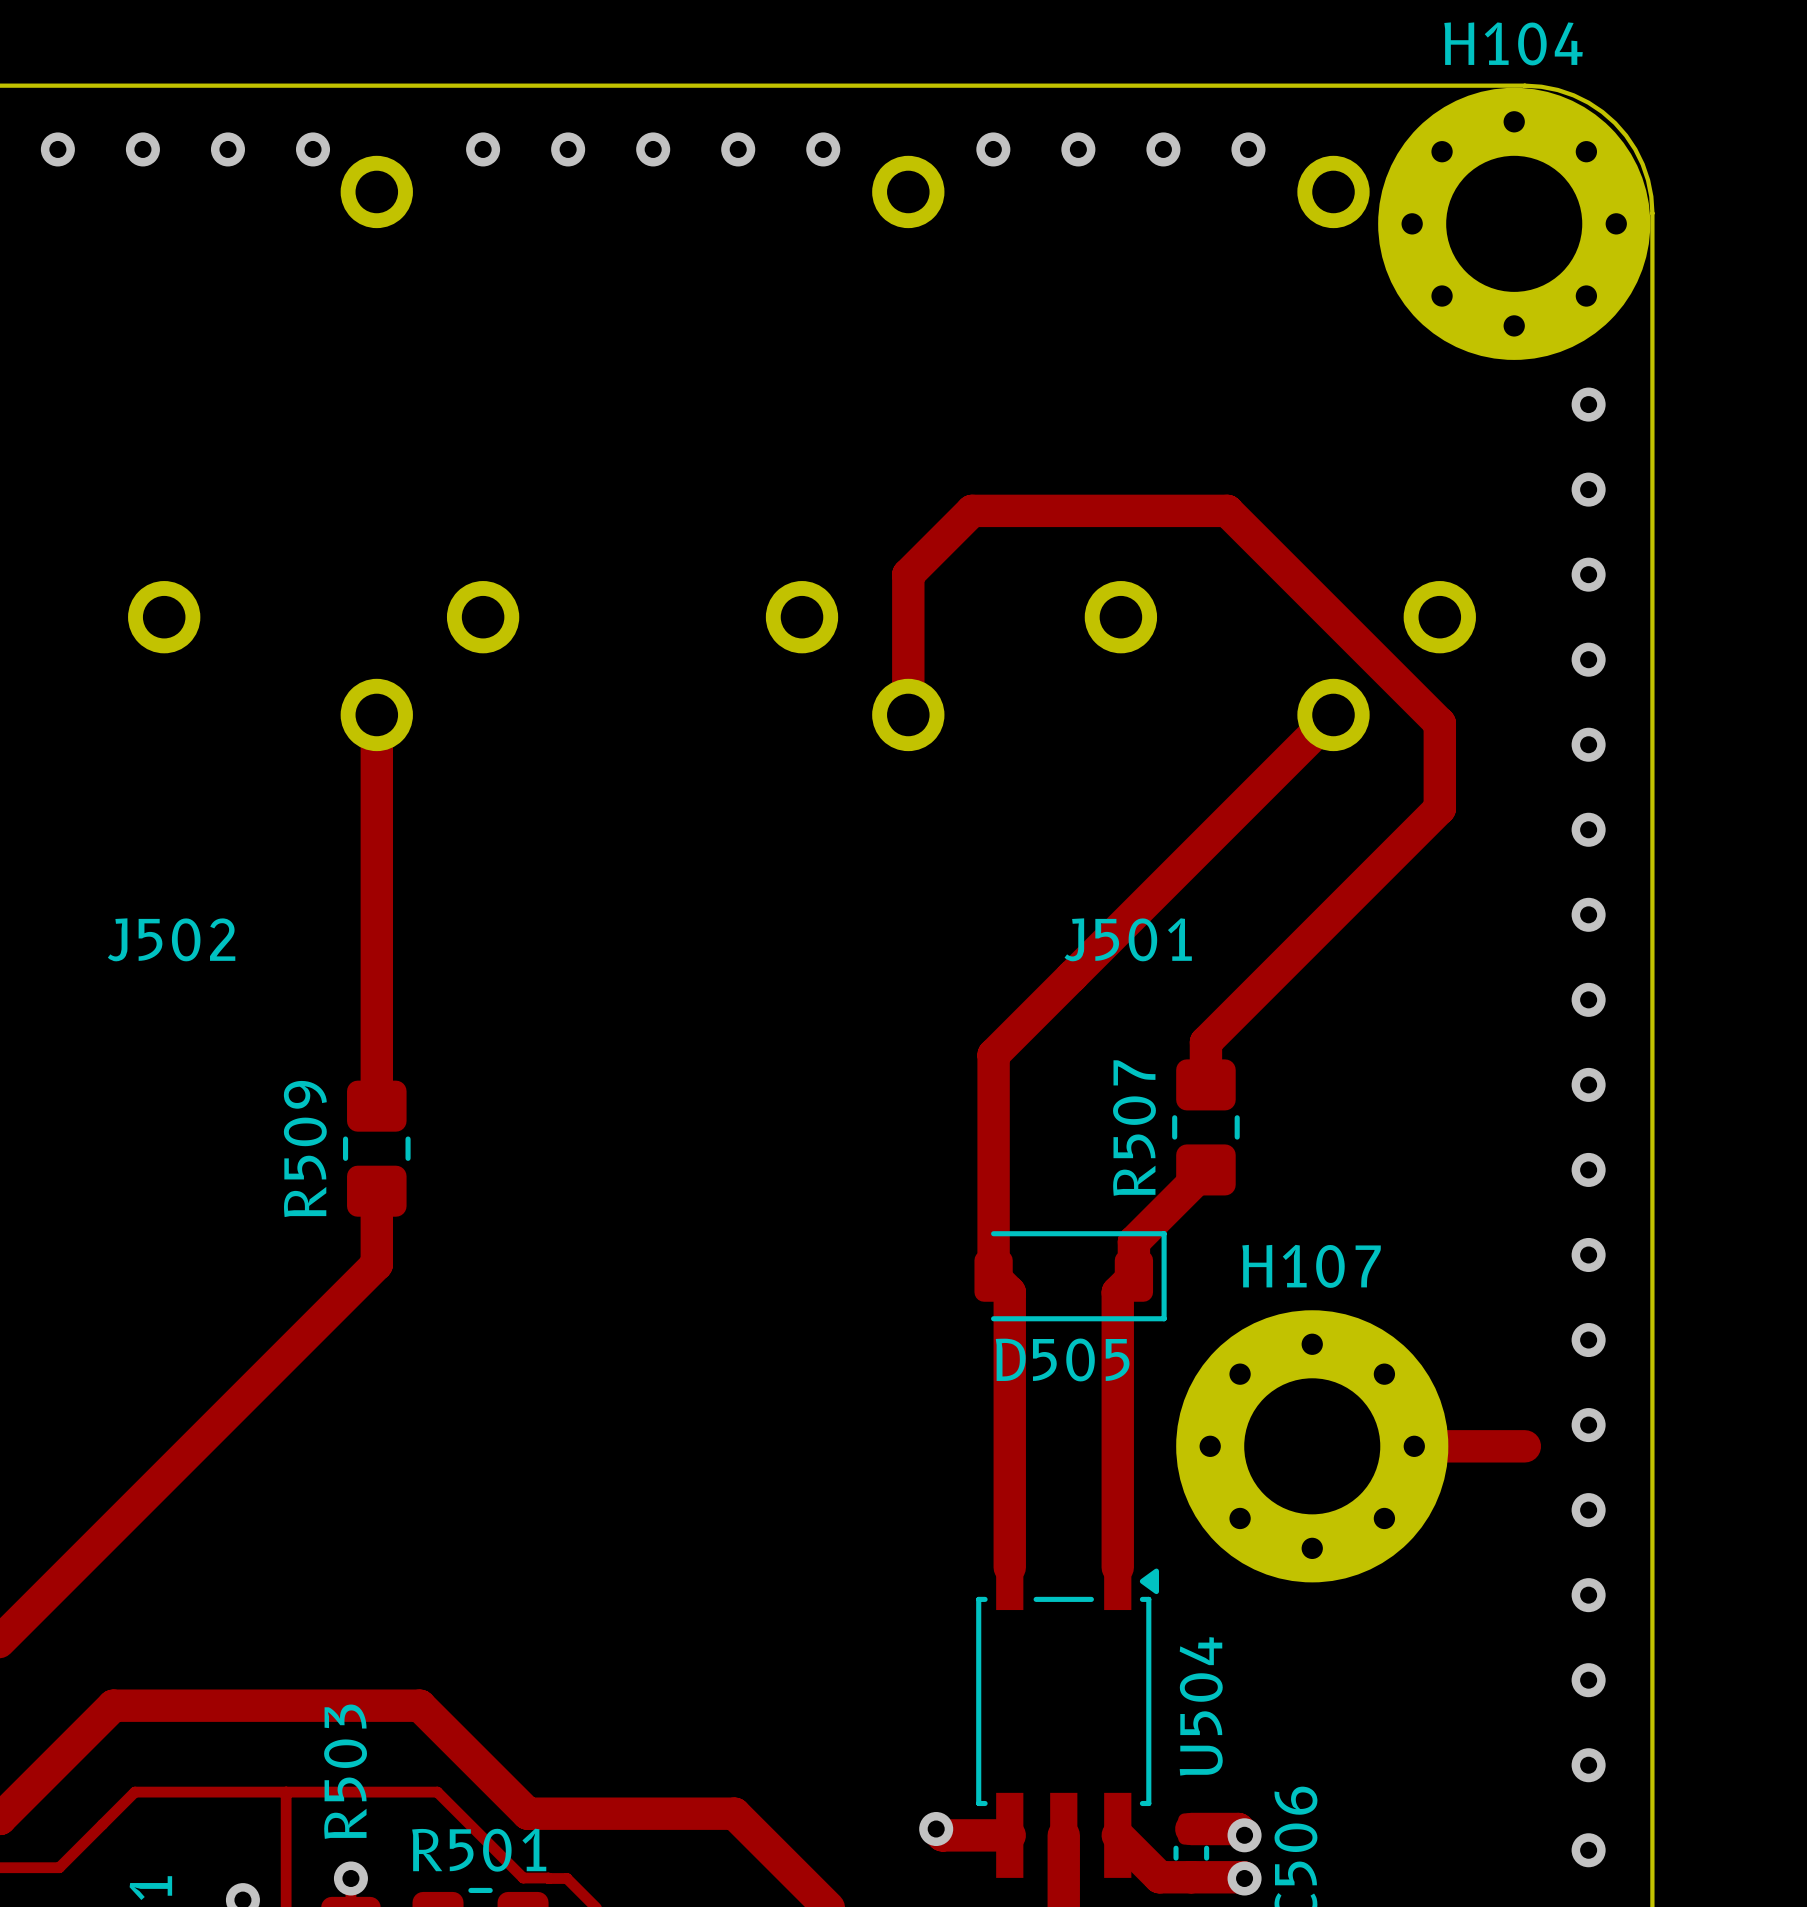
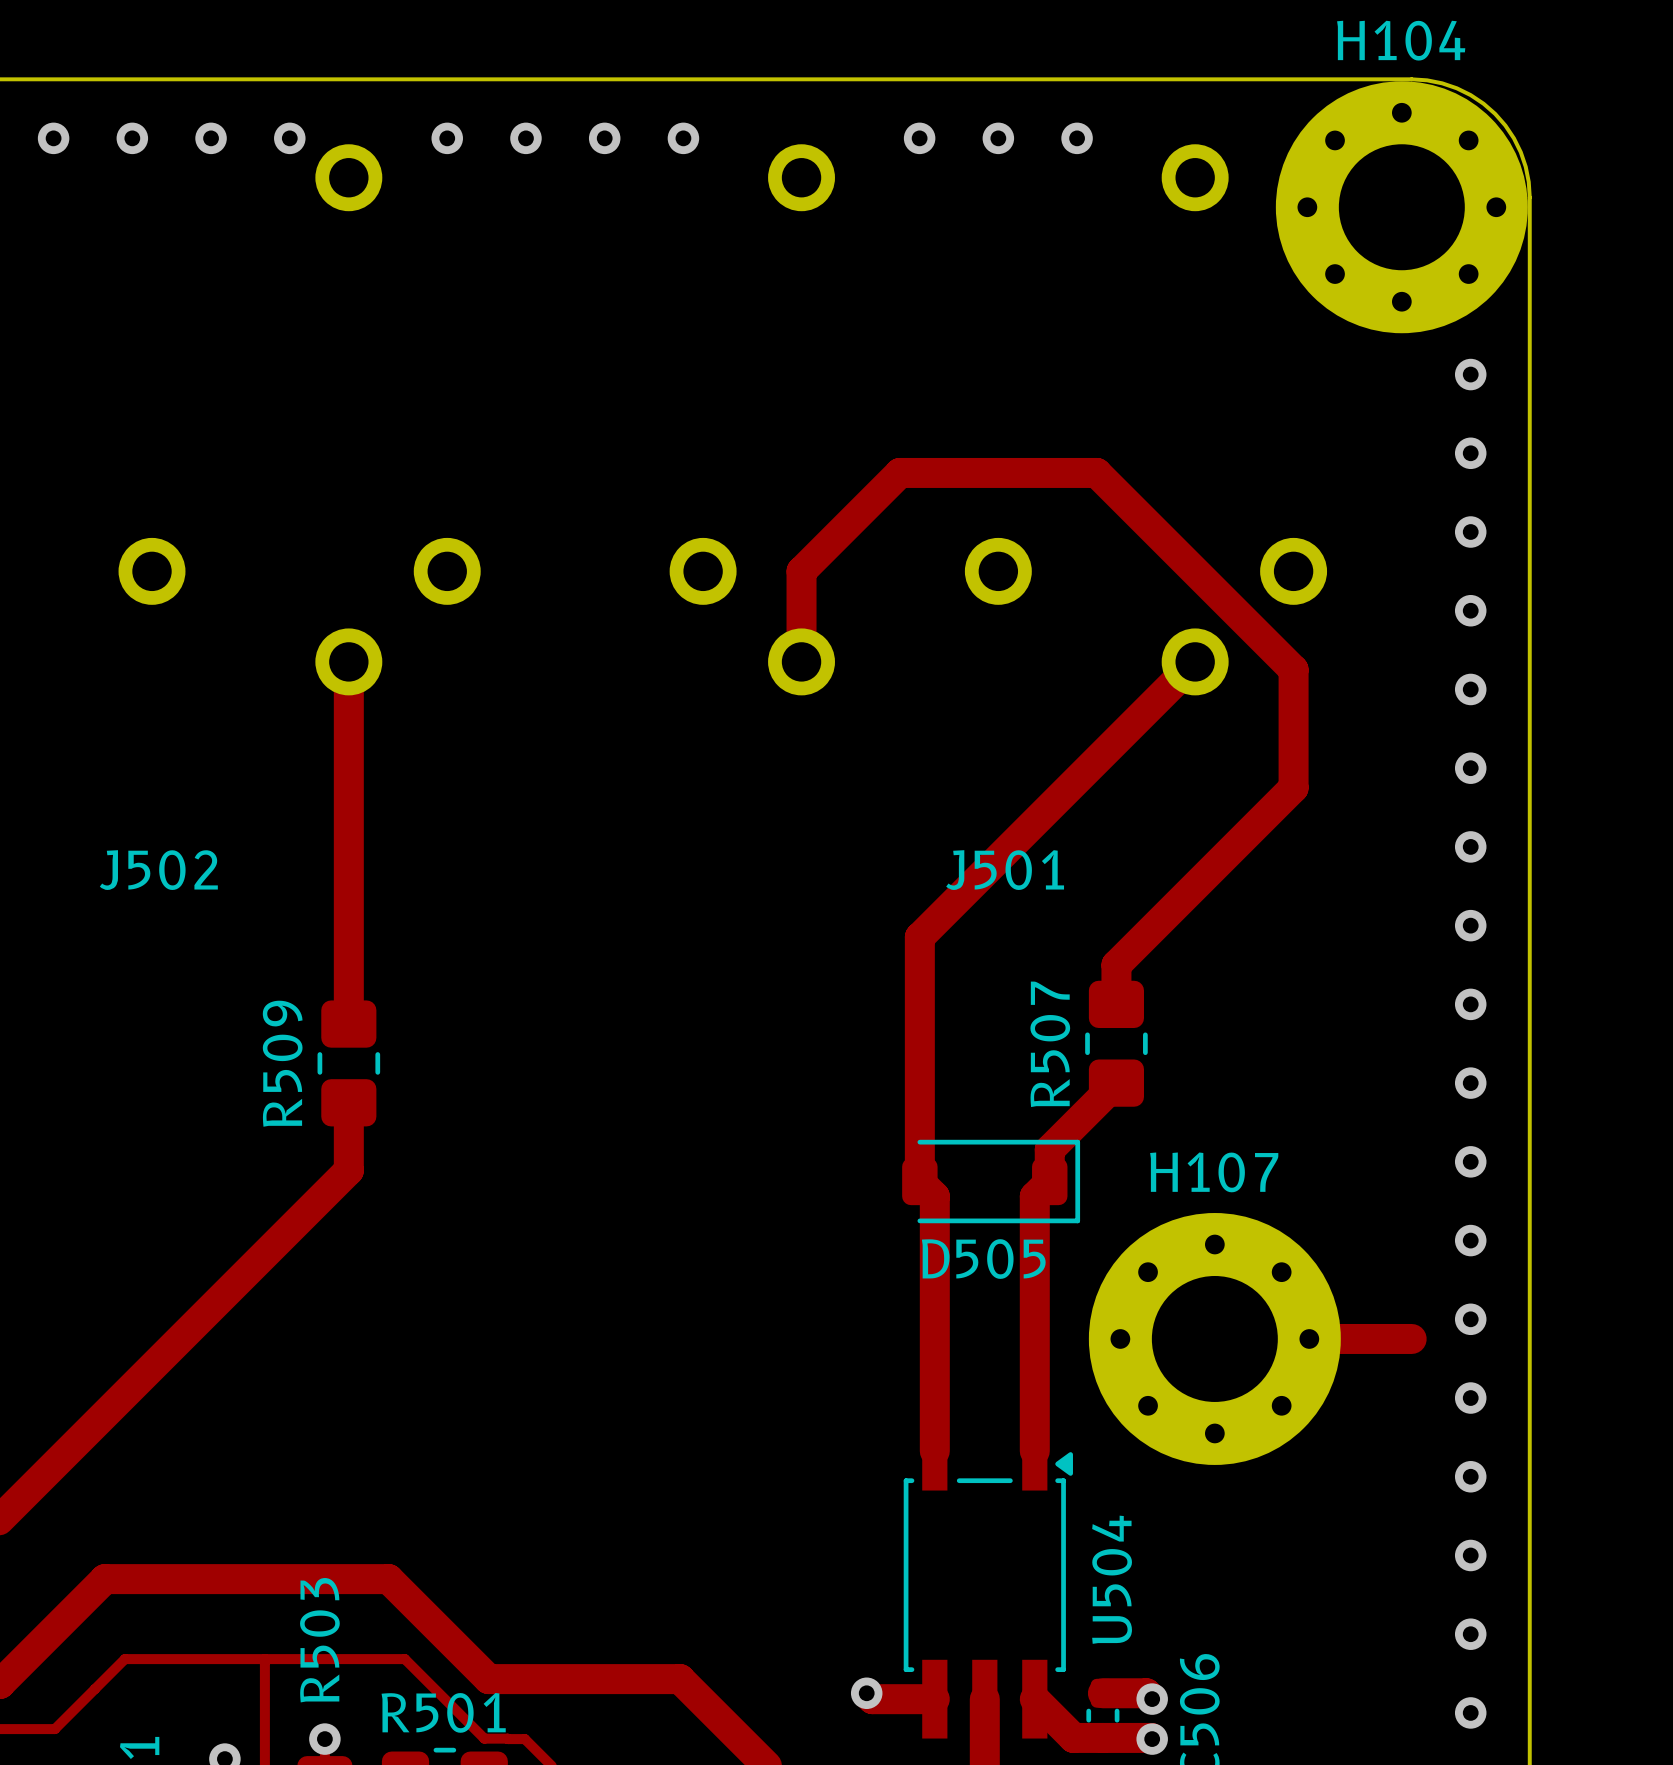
via: (823, 149) -> none
via: (1248, 149) -> none
J501 position: (1120, 453) -> (998, 419)
track: (1184, 510) (1227, 510) (1439, 723) (1439, 808) (1397, 851) -> (1096, 472) (1293, 669) (1293, 787)
track: (908, 574) (908, 714) -> (840, 532) (801, 571) (801, 661)
track: (1333, 714) (993, 1054) -> (1195, 661) (919, 937) (919, 976)

